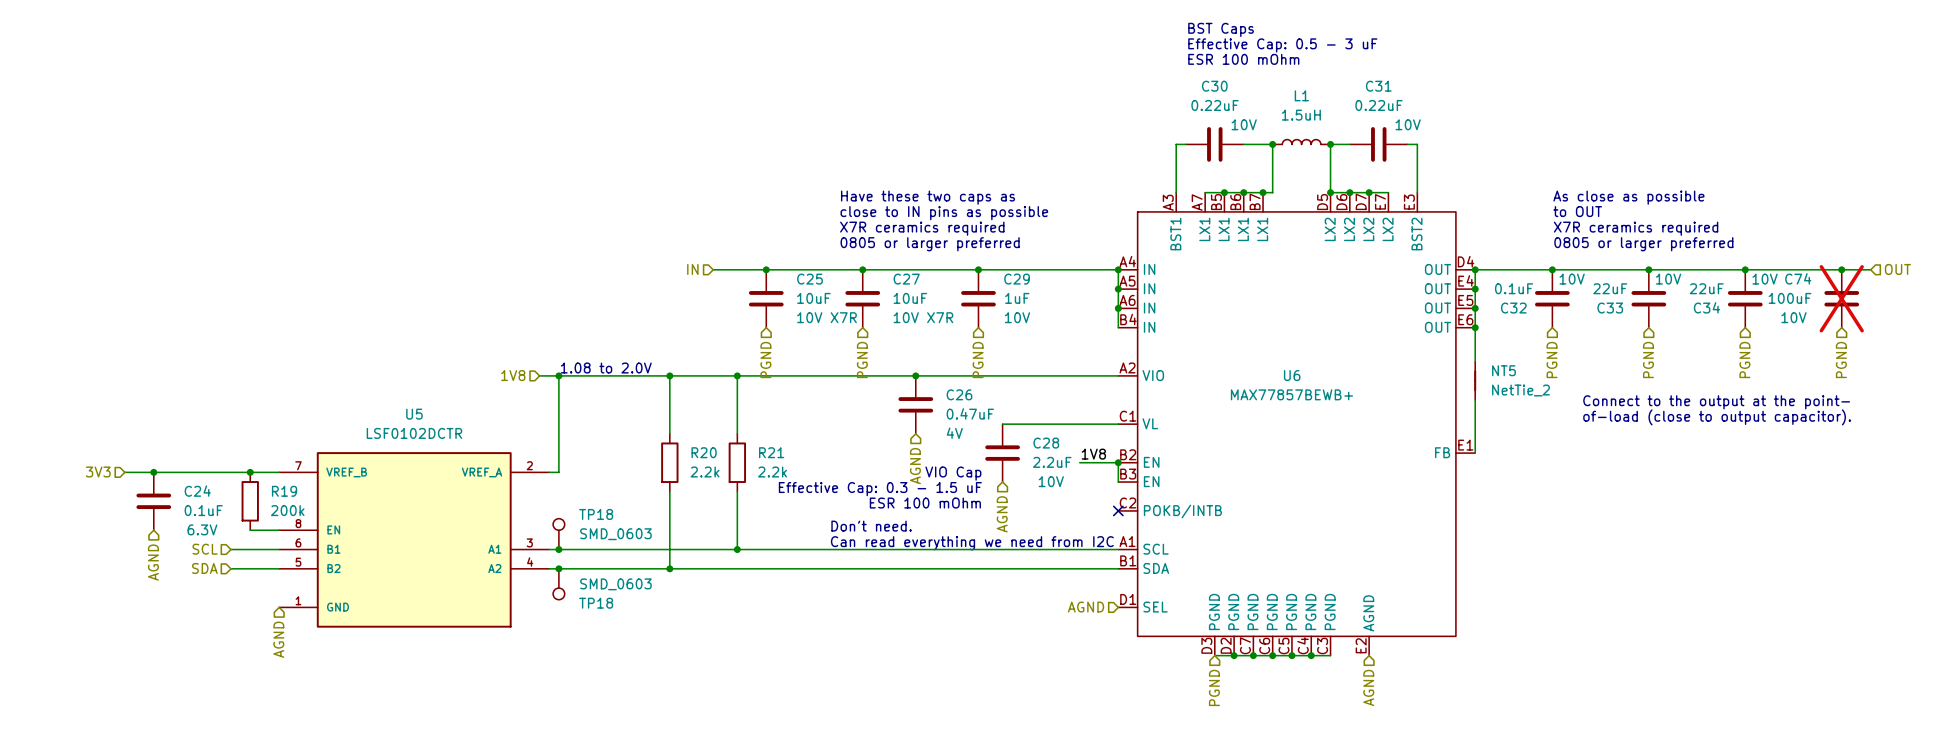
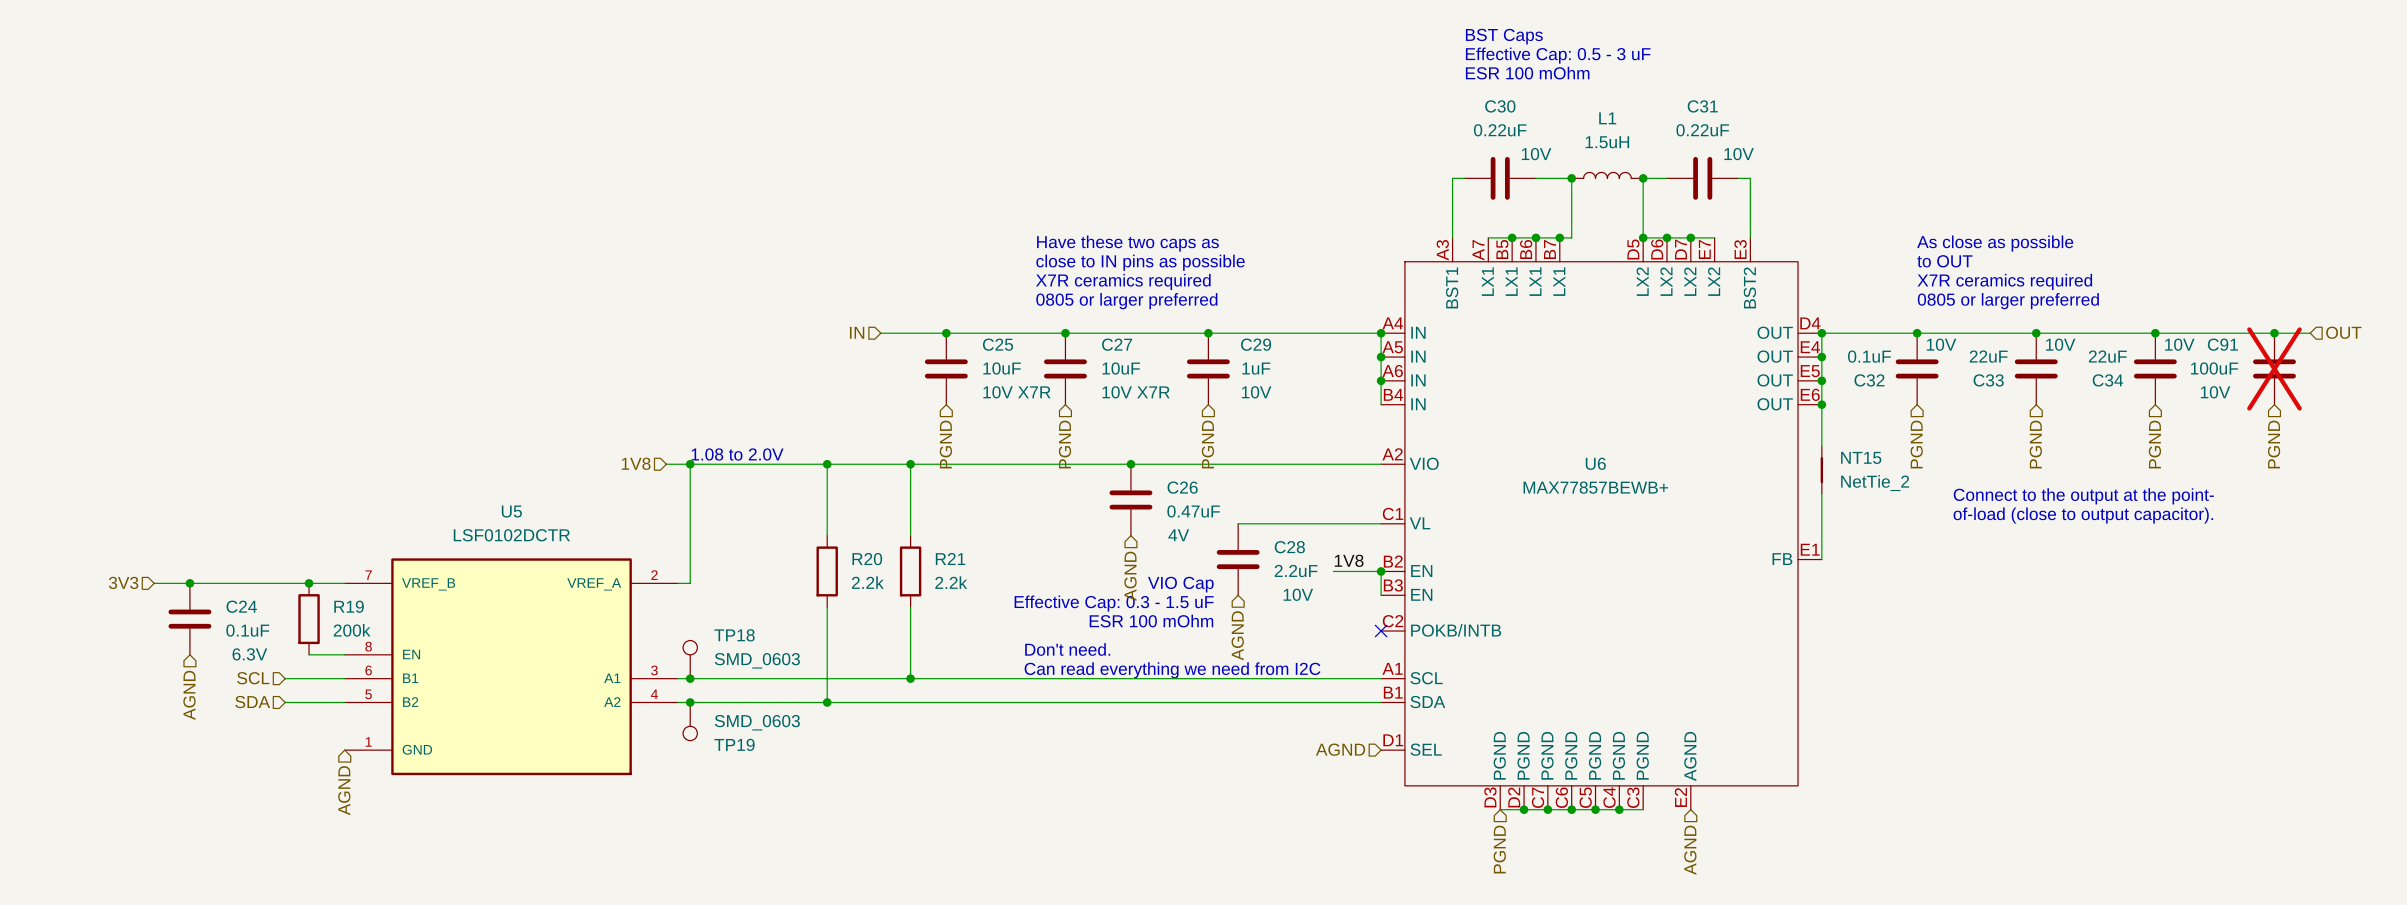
C74 name: C74 (1798, 278) -> C91 (2222, 344)
NT5 name: NT5 (1504, 370) -> NT15 (1861, 457)
TP18 name: TP18 (596, 603) -> TP19 (734, 744)

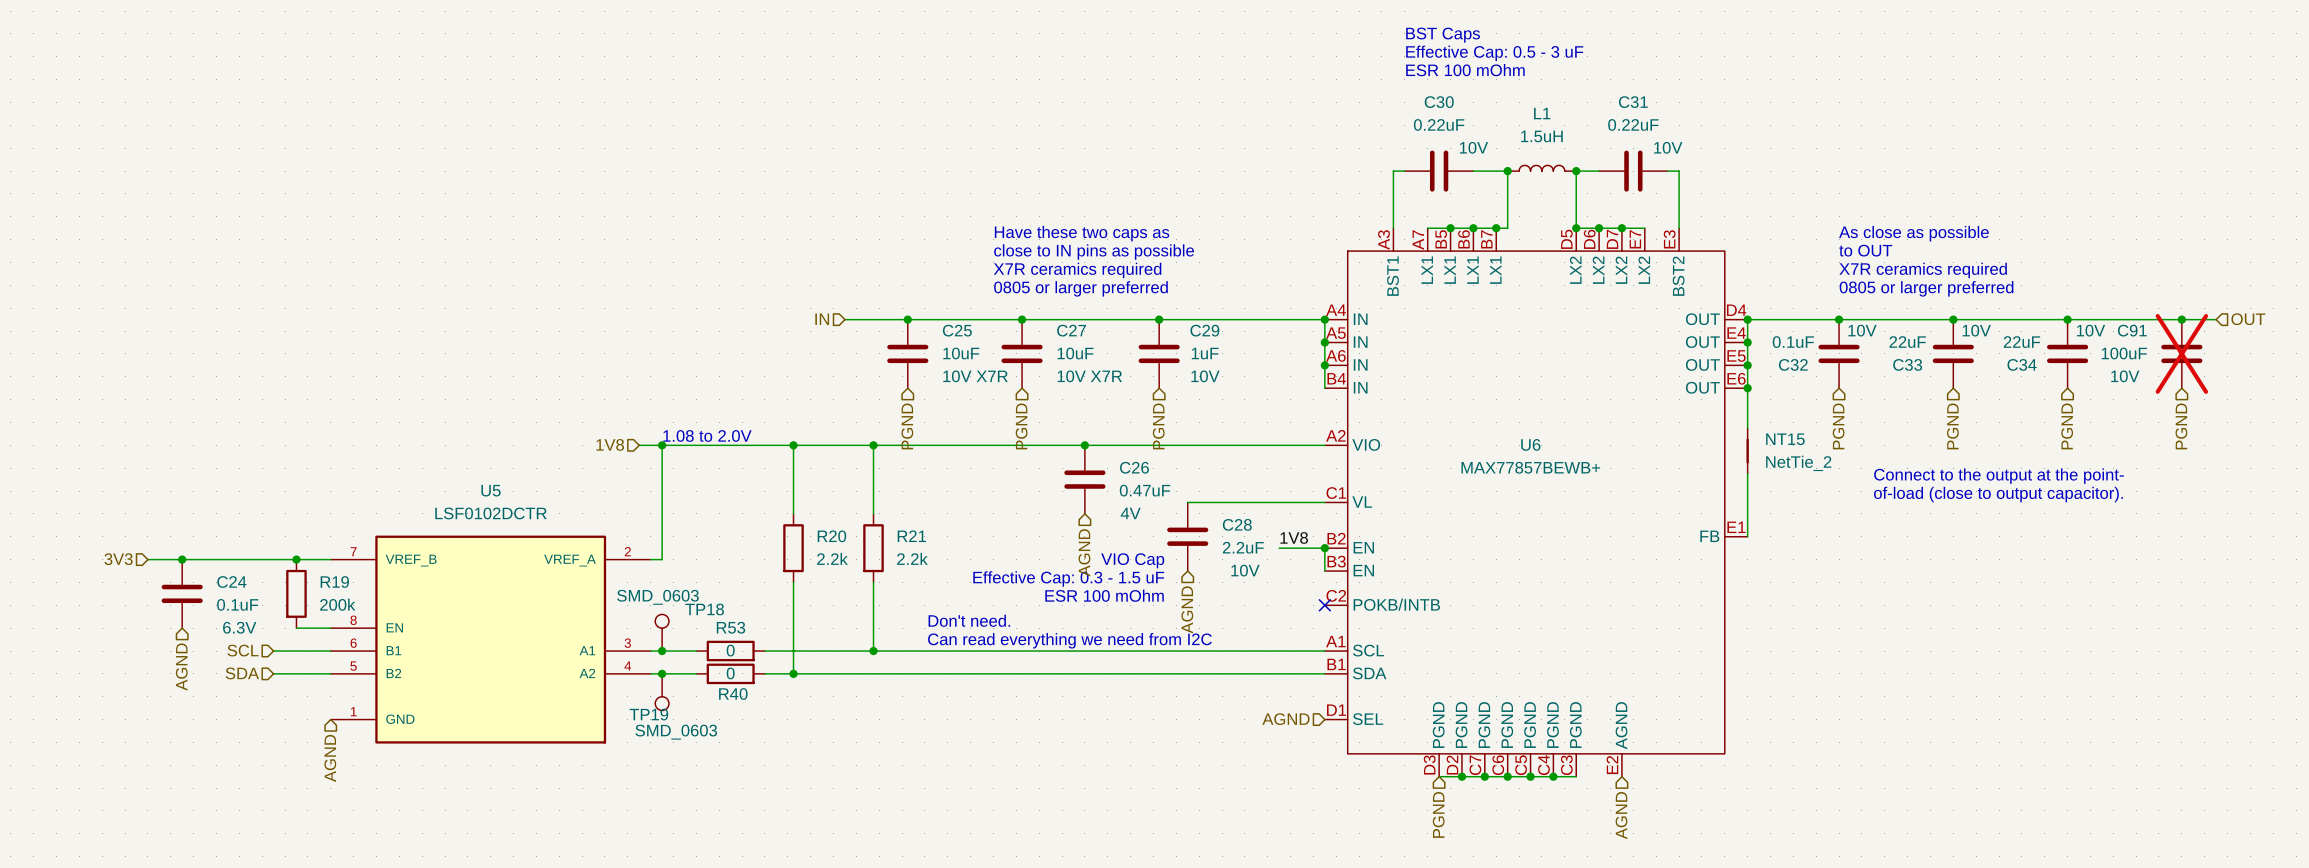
text position: Don't need. (1067, 649) -> Don't need. (969, 620)
TP18 value position: SMD_0603 (757, 660) -> SMD_0603 (657, 597)
text position: Can read everything we need from I2C (1172, 670) -> Can read everything we need from I2C (1069, 640)
wire: (725, 678) (797, 678) -> none
R53: none -> 0 (730, 651)
wire: (725, 702) (797, 702) -> none
R40: none -> 0 (730, 673)
TP19 value position: SMD_0603 (757, 722) -> SMD_0603 (676, 732)
TP19 name position: TP19 (734, 744) -> TP19 (648, 714)

